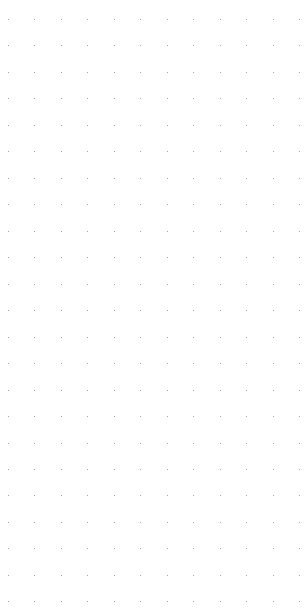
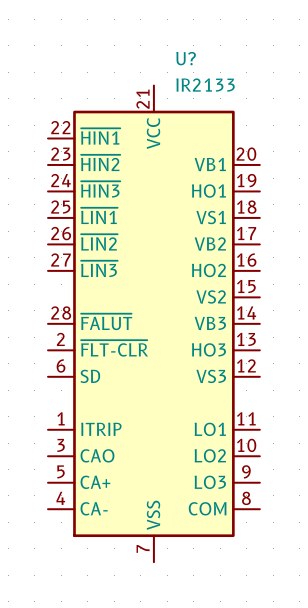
U?: none -> IR2133 (153, 323)

